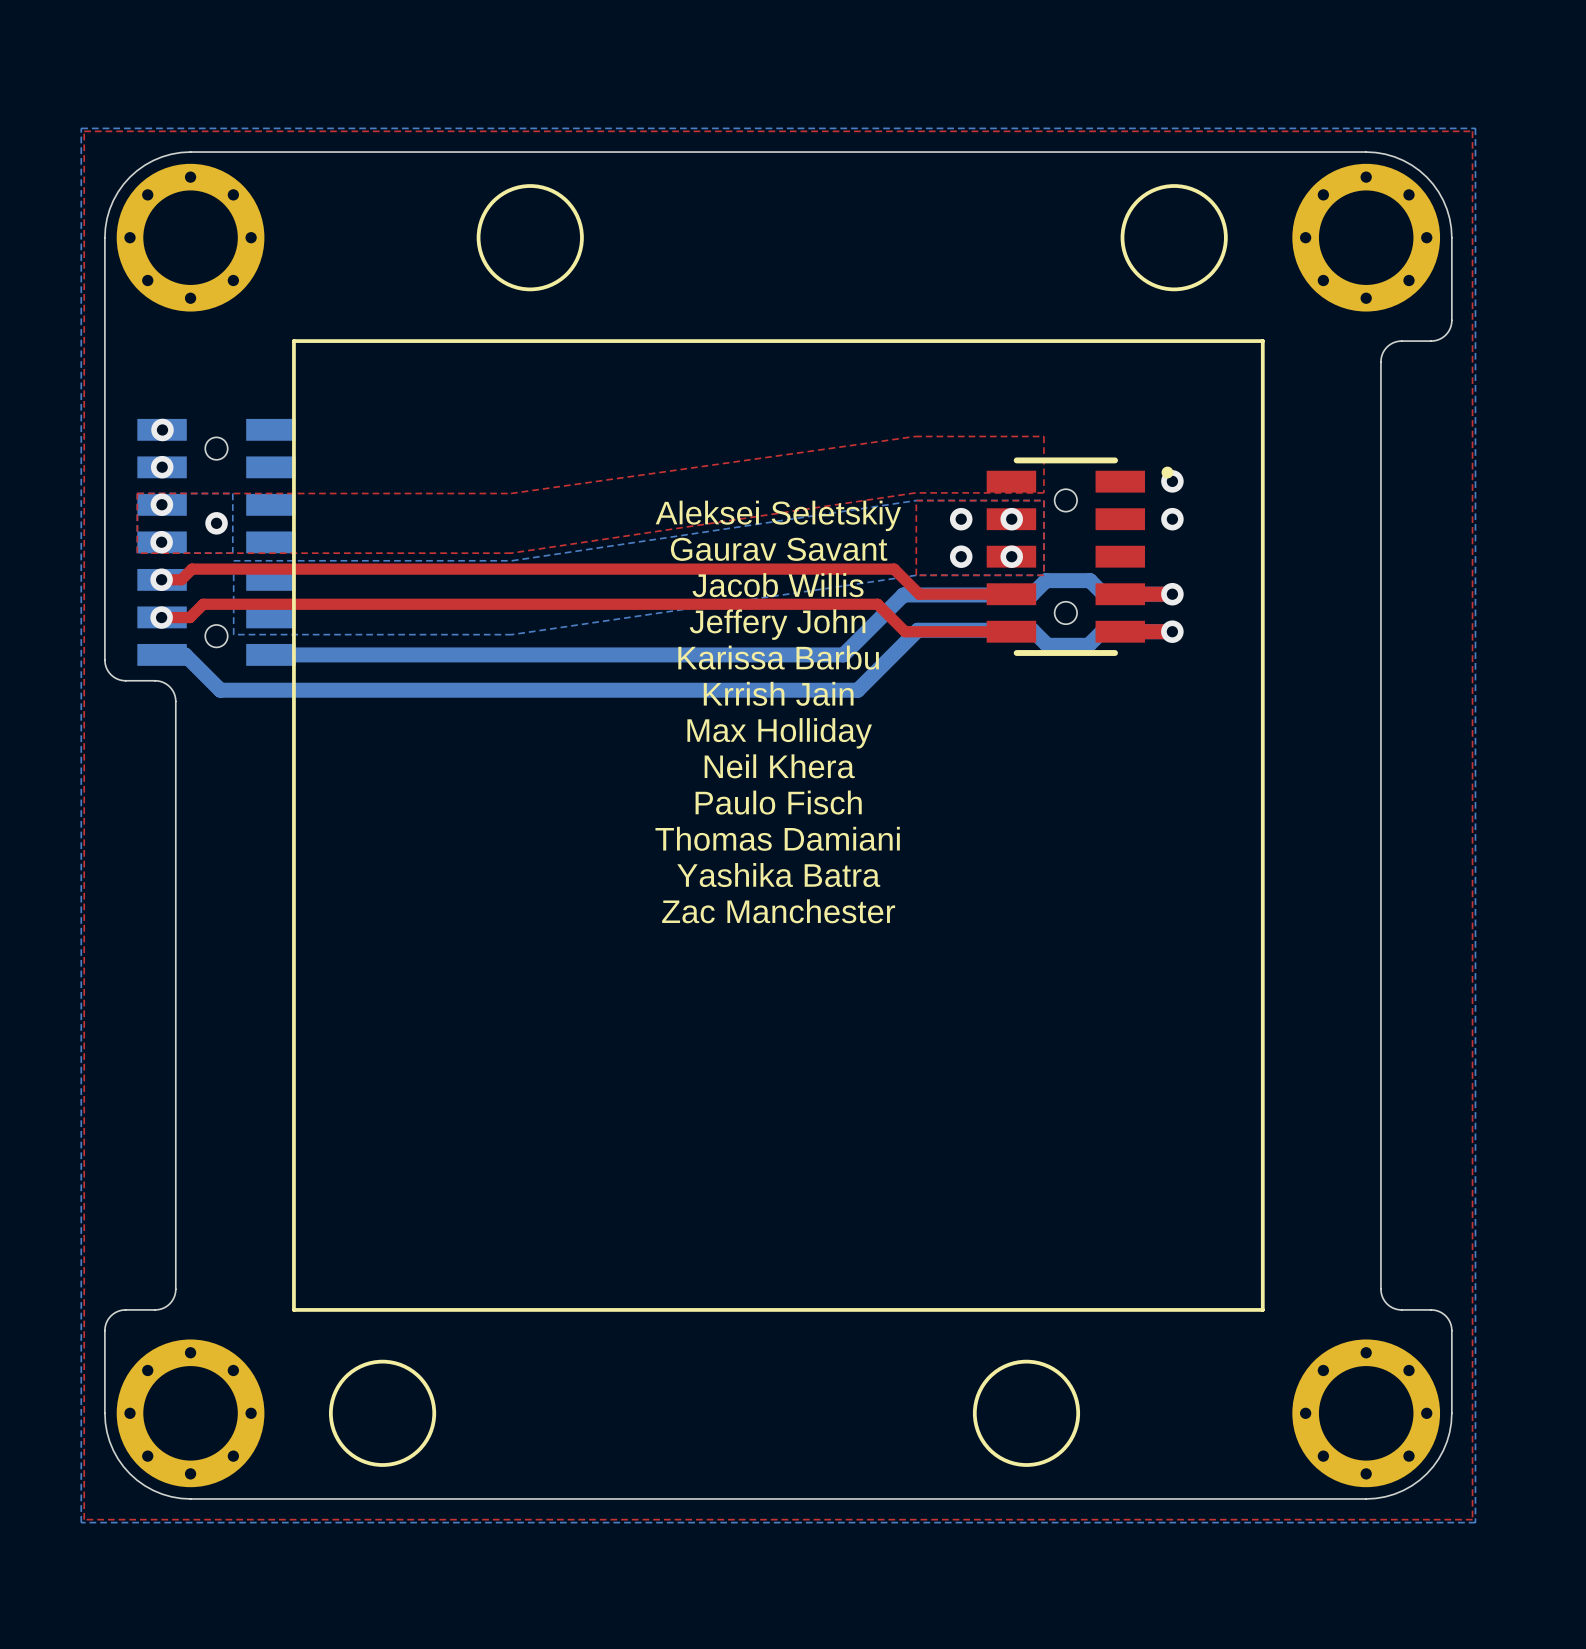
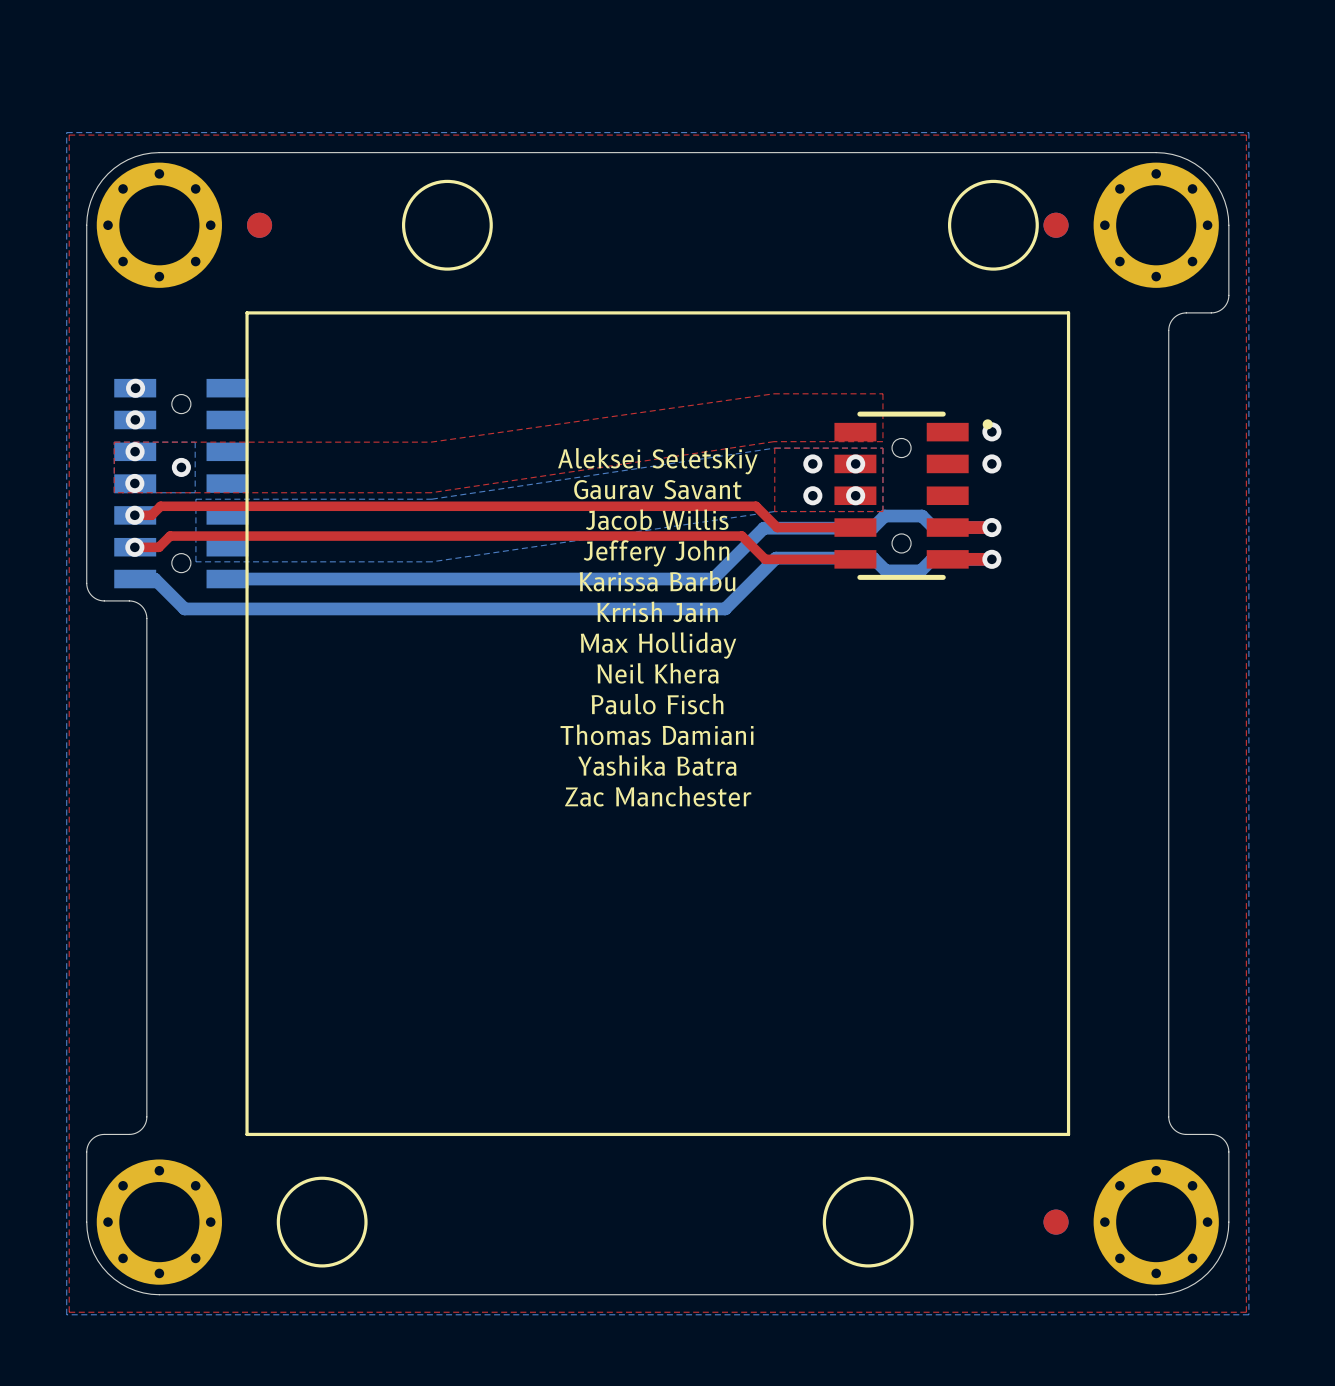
part: none -> (259, 225)
part: none -> (1056, 225)
part: none -> (1056, 1222)

